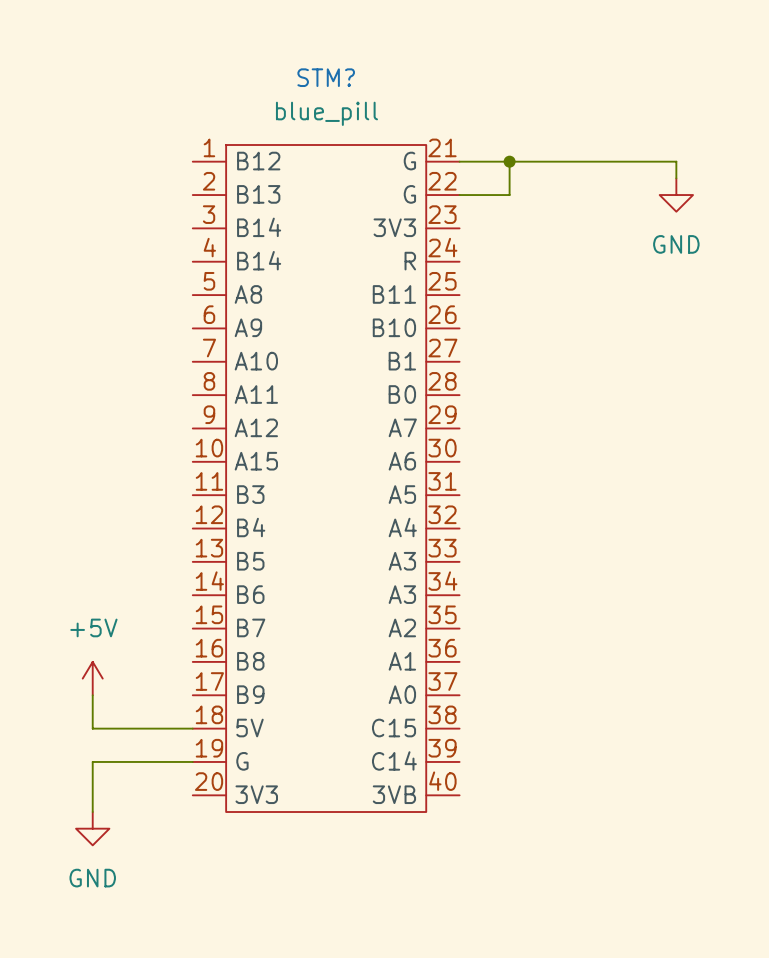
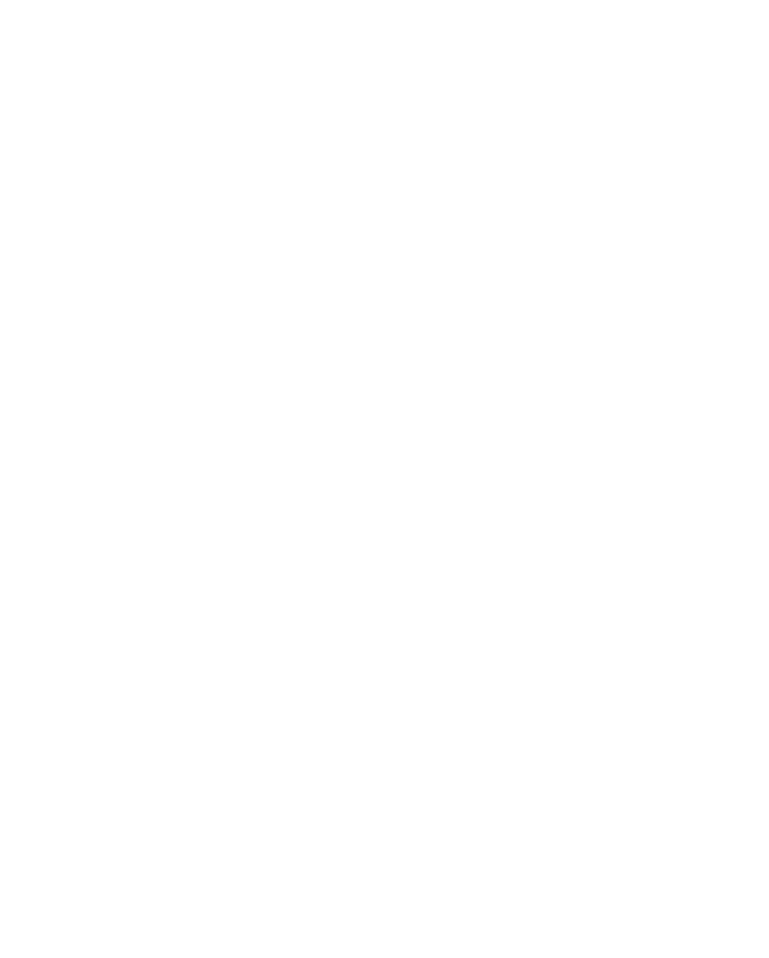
wire: (459, 161) (676, 161) (676, 178) -> none
wire: (509, 161) (509, 195) (459, 195) -> none
junction: (509, 161) -> none
power symbol: GND (676, 195) -> none
STM?: blue_pill (326, 478) -> none
power symbol: +5V (92, 678) -> none
wire: (92, 695) (92, 728) (192, 728) -> none
wire: (192, 761) (92, 761) (92, 812) -> none
power symbol: GND (92, 828) -> none

